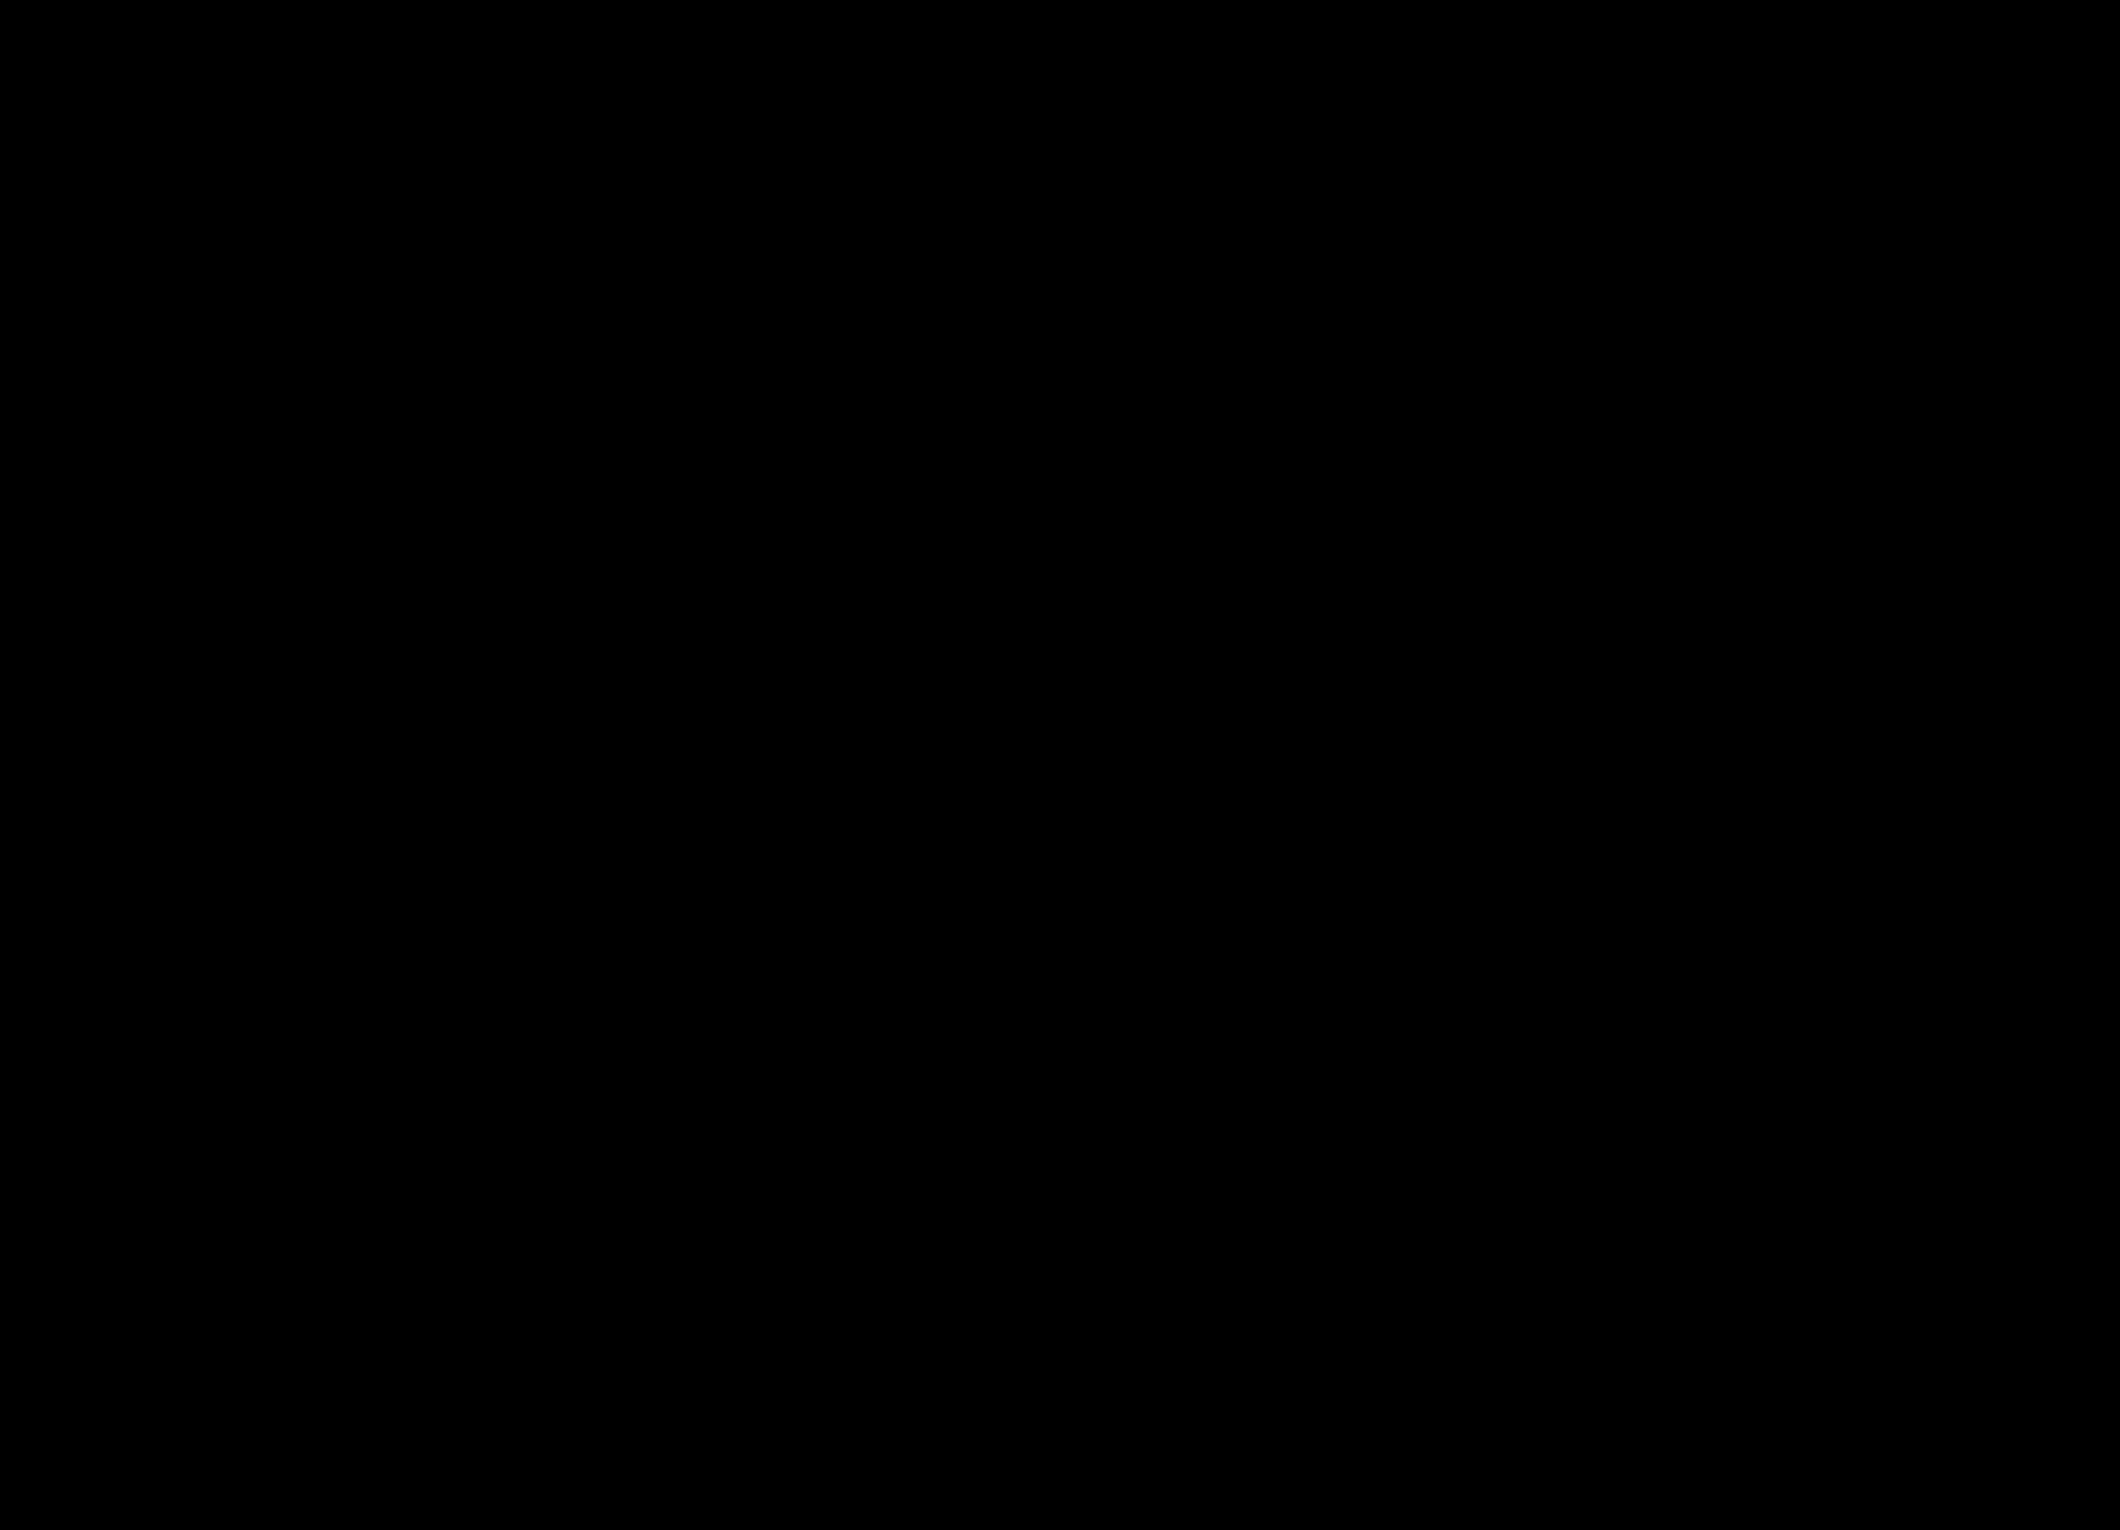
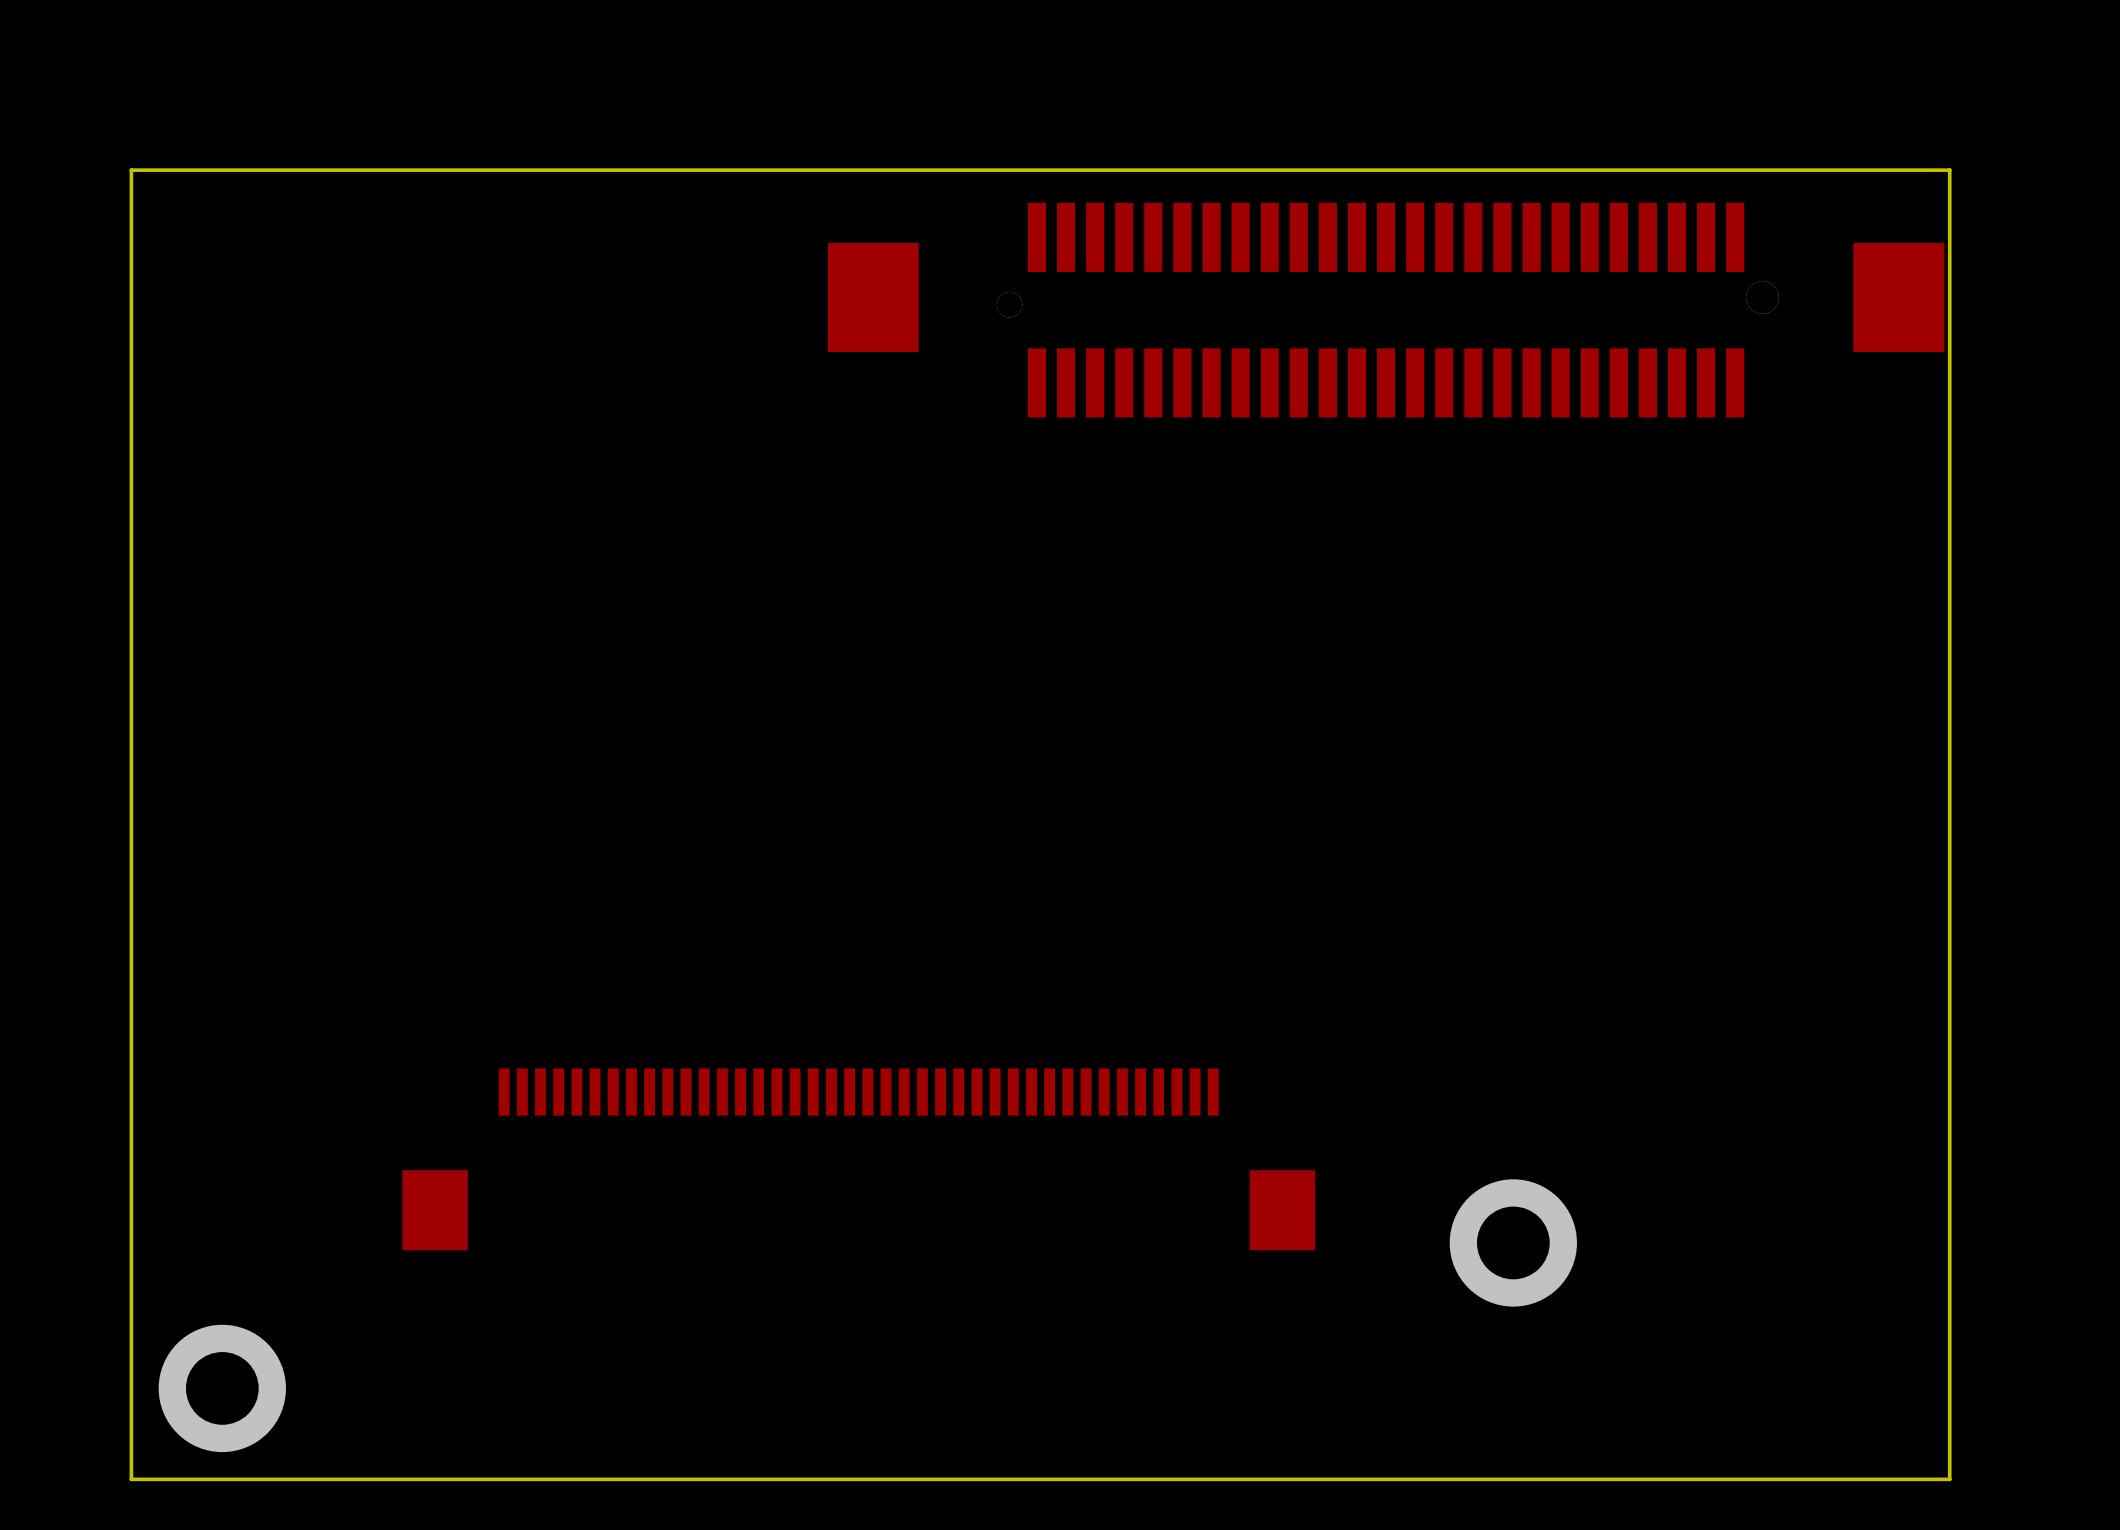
board edge: none -> (1949, 170) (1949, 1479) (131, 1479) (131, 170) (1949, 170)
part: none -> (1386, 310)
part: none -> (858, 1159)
via: none -> (1513, 1242)
via: none -> (222, 1388)

